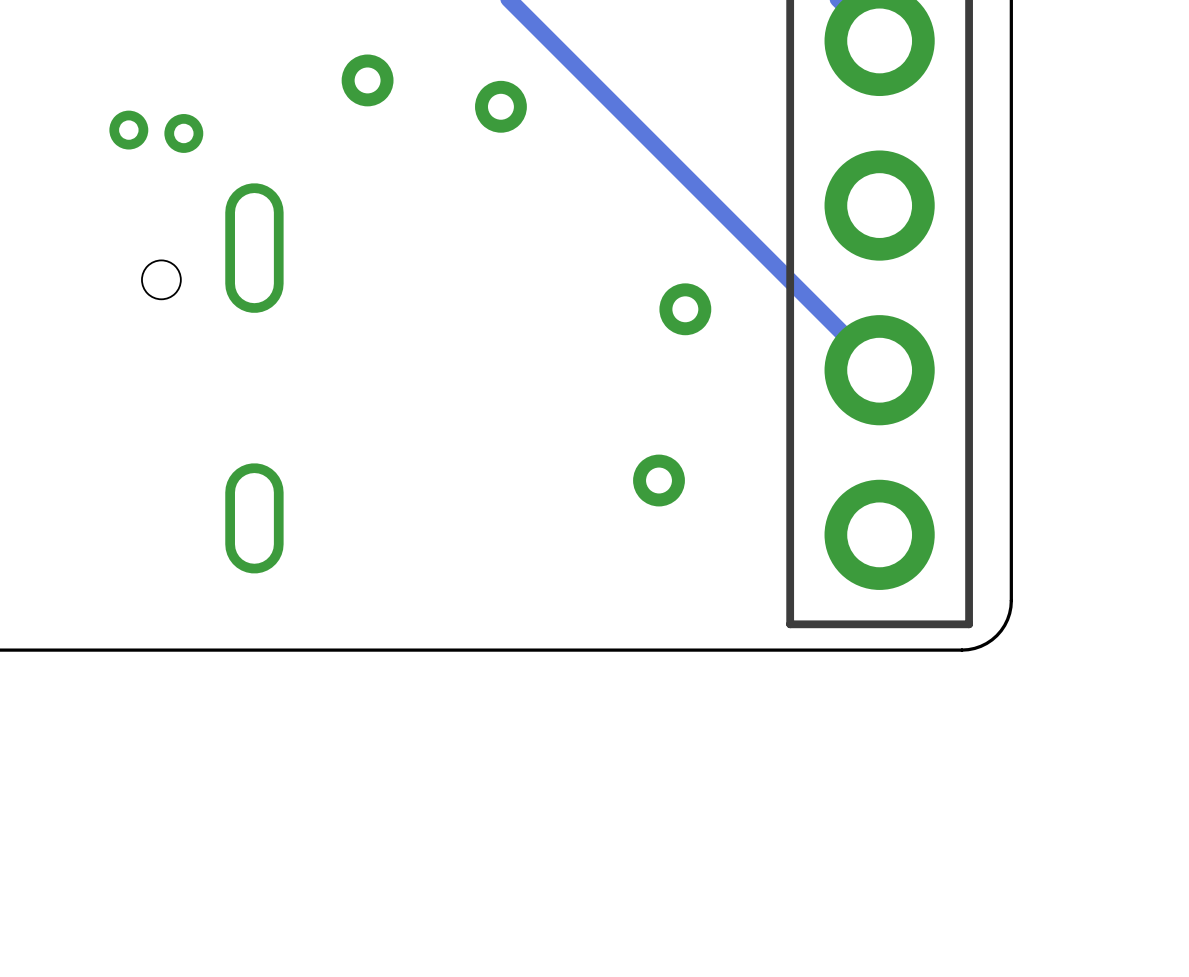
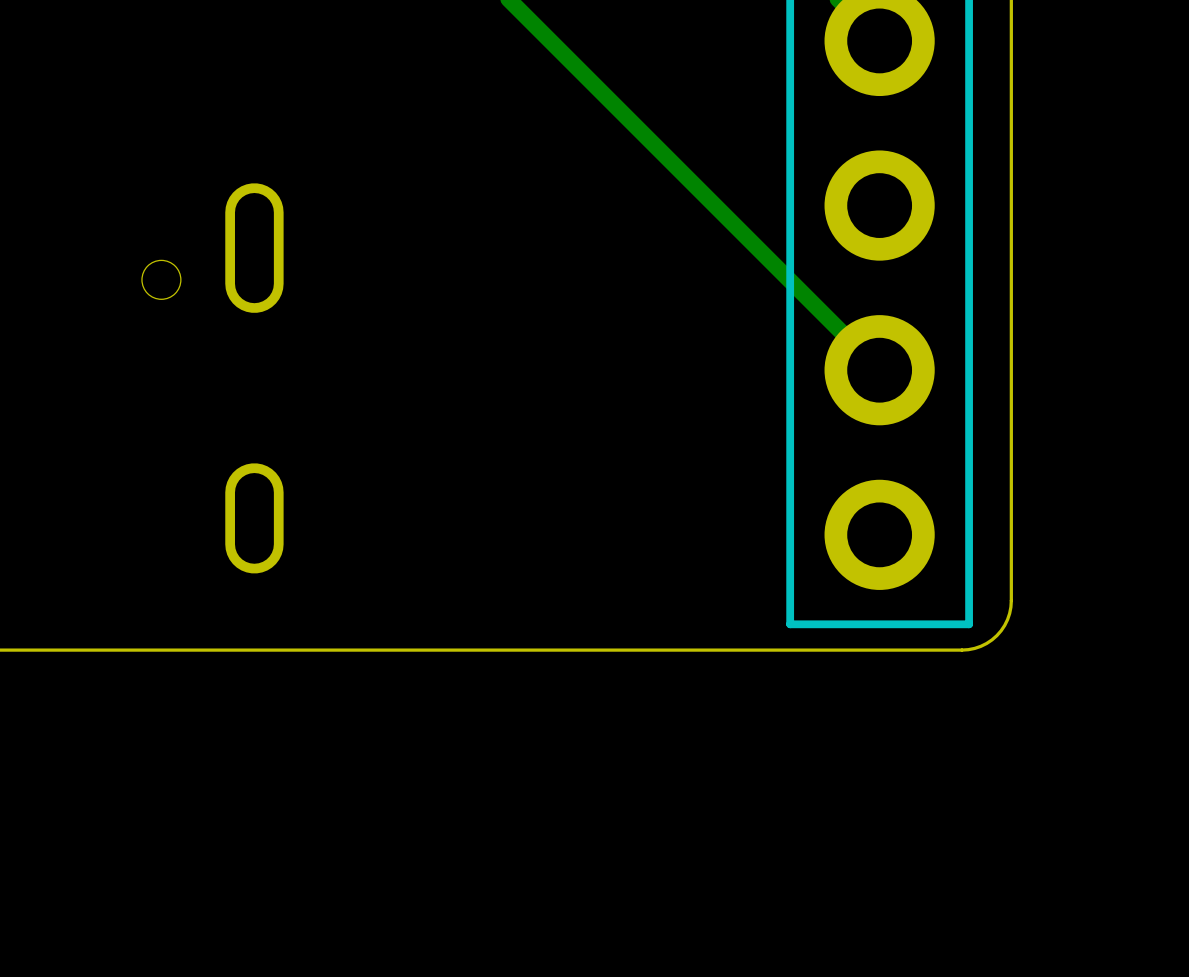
via: (367, 80) -> none
via: (500, 106) -> none
via: (128, 130) -> none
via: (183, 133) -> none
via: (685, 309) -> none
via: (659, 480) -> none

